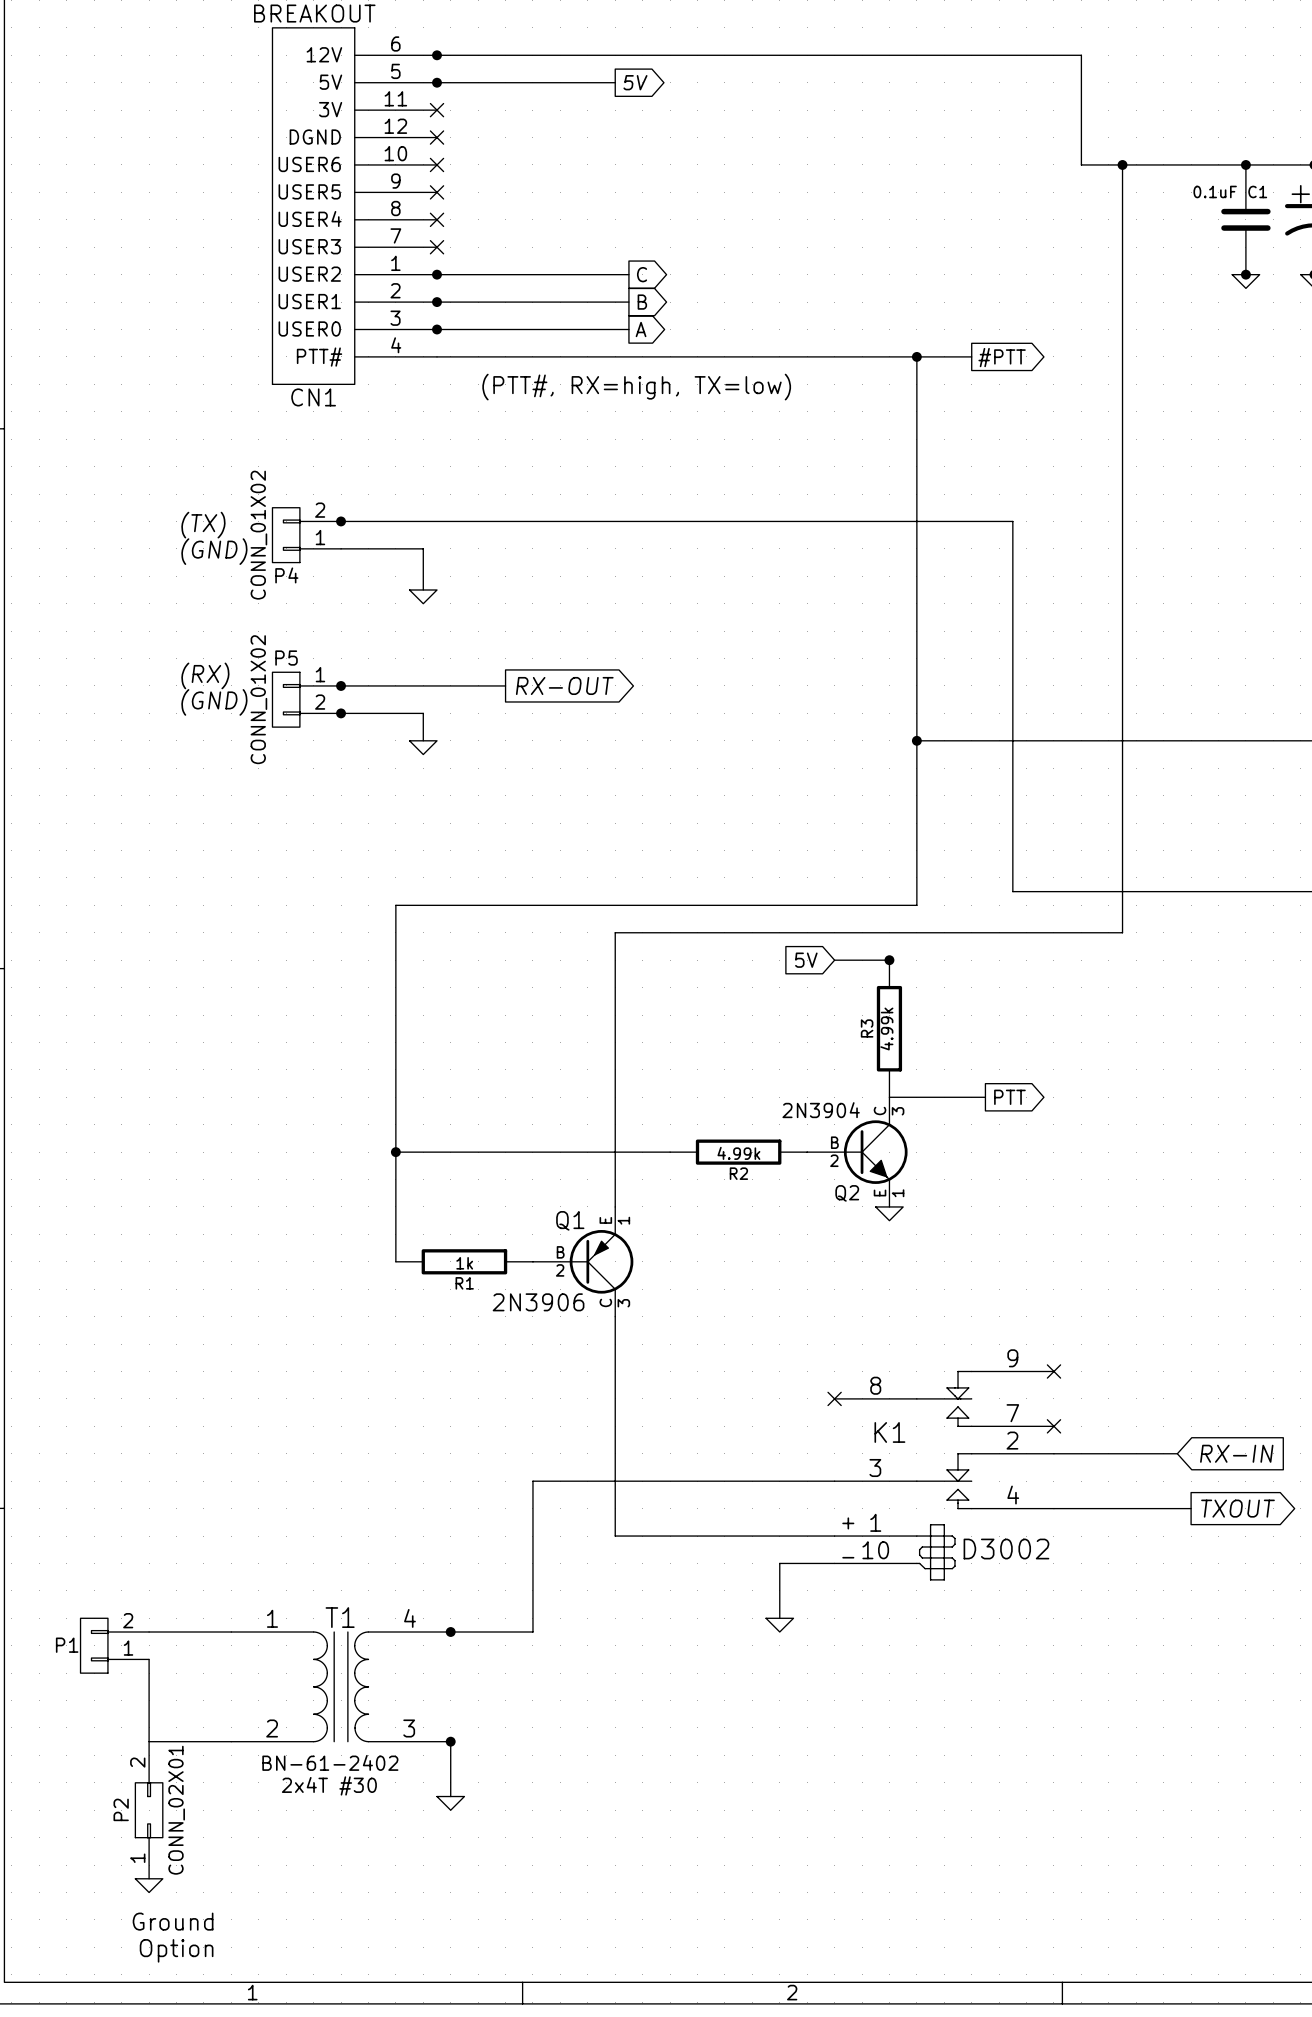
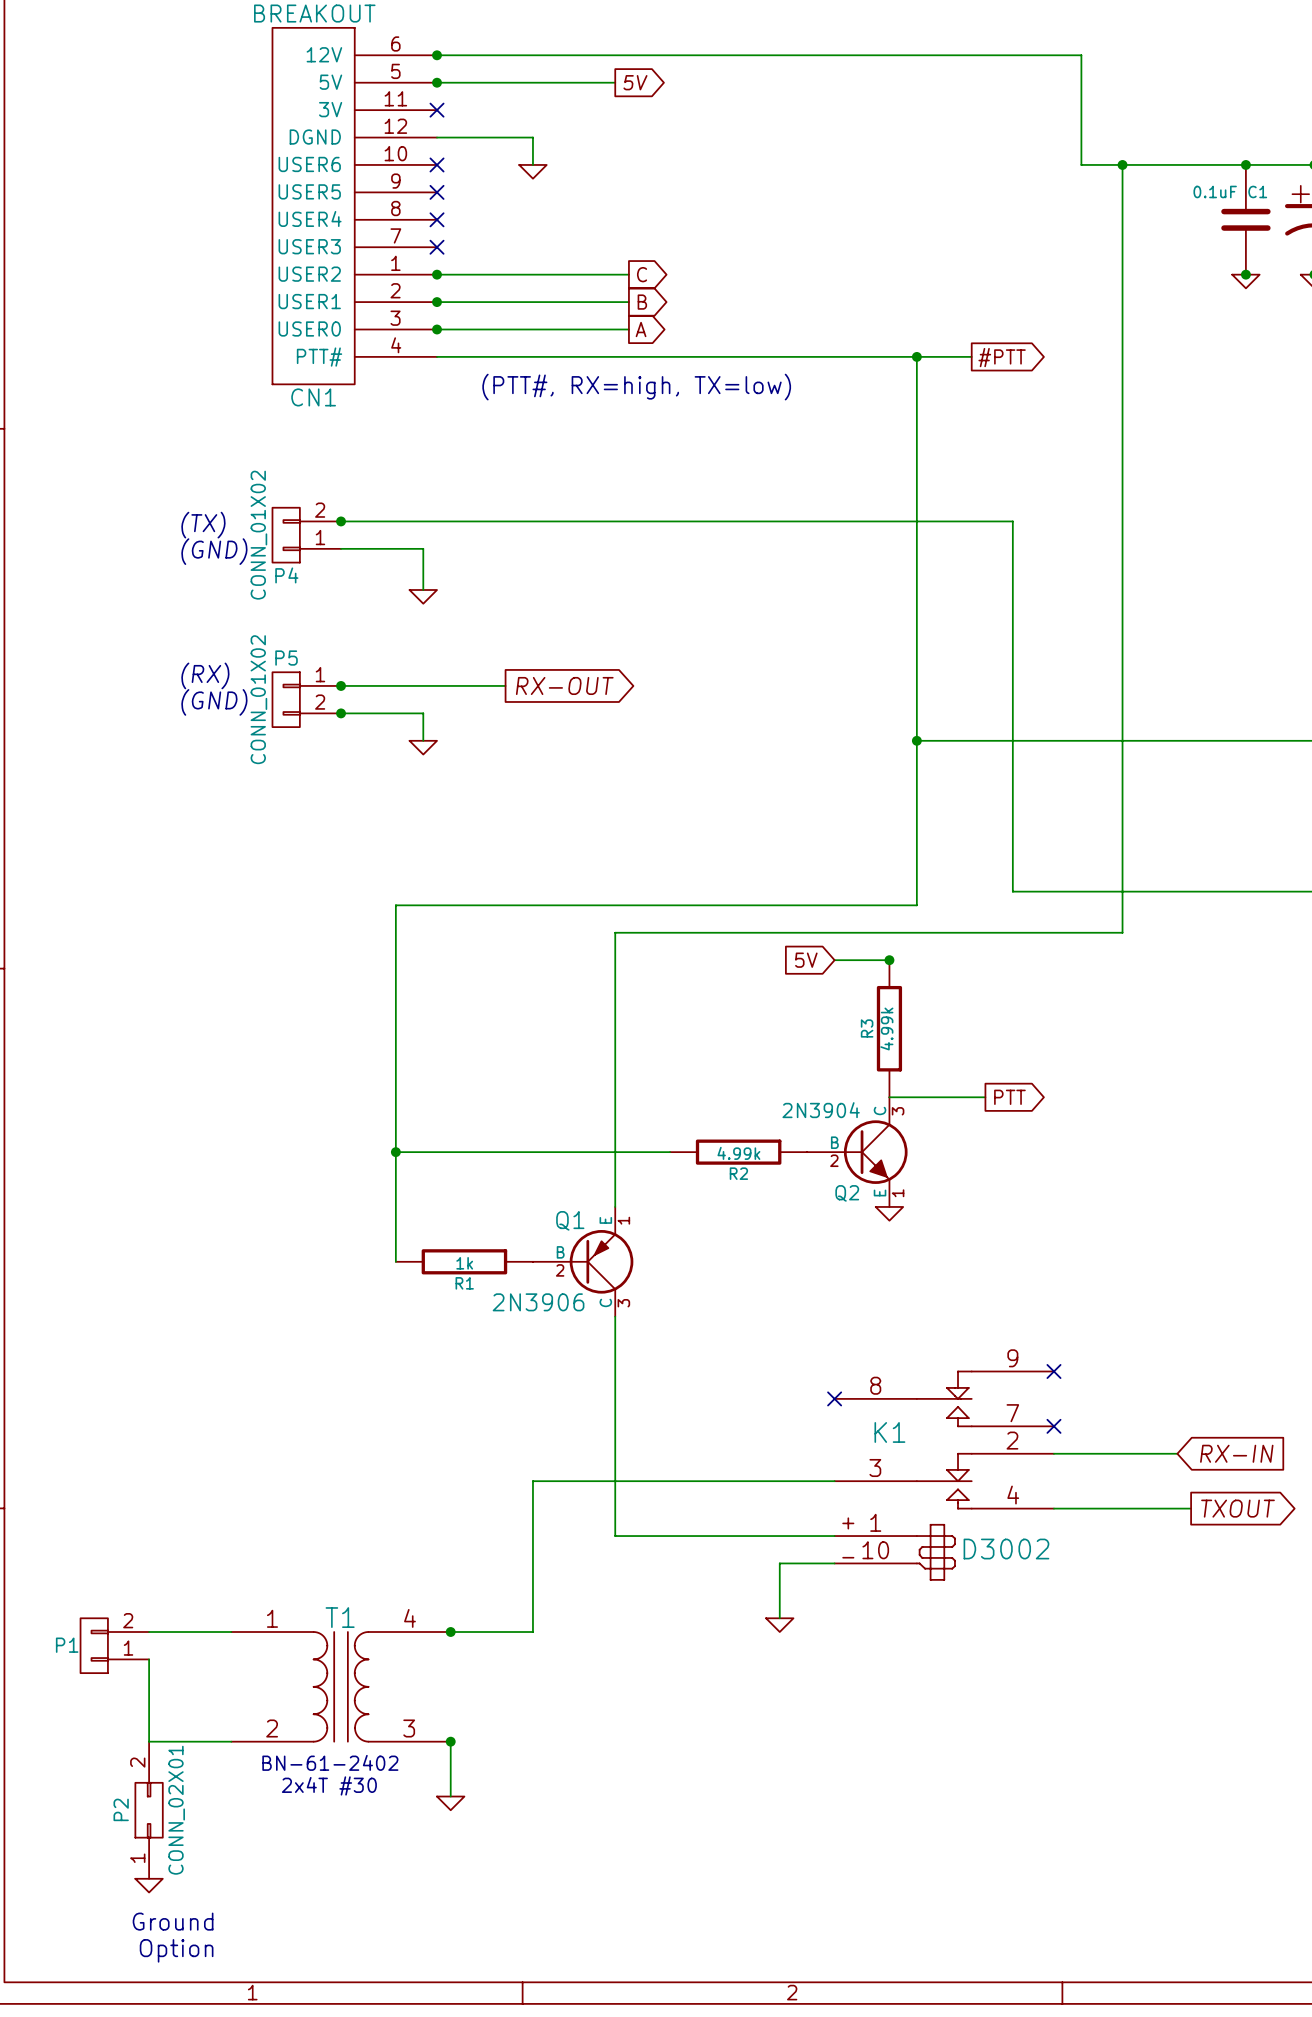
wire: none -> (437, 137) (532, 137) (532, 164)
no-connect mark: (437, 137) -> none
power symbol: none -> (532, 171)

